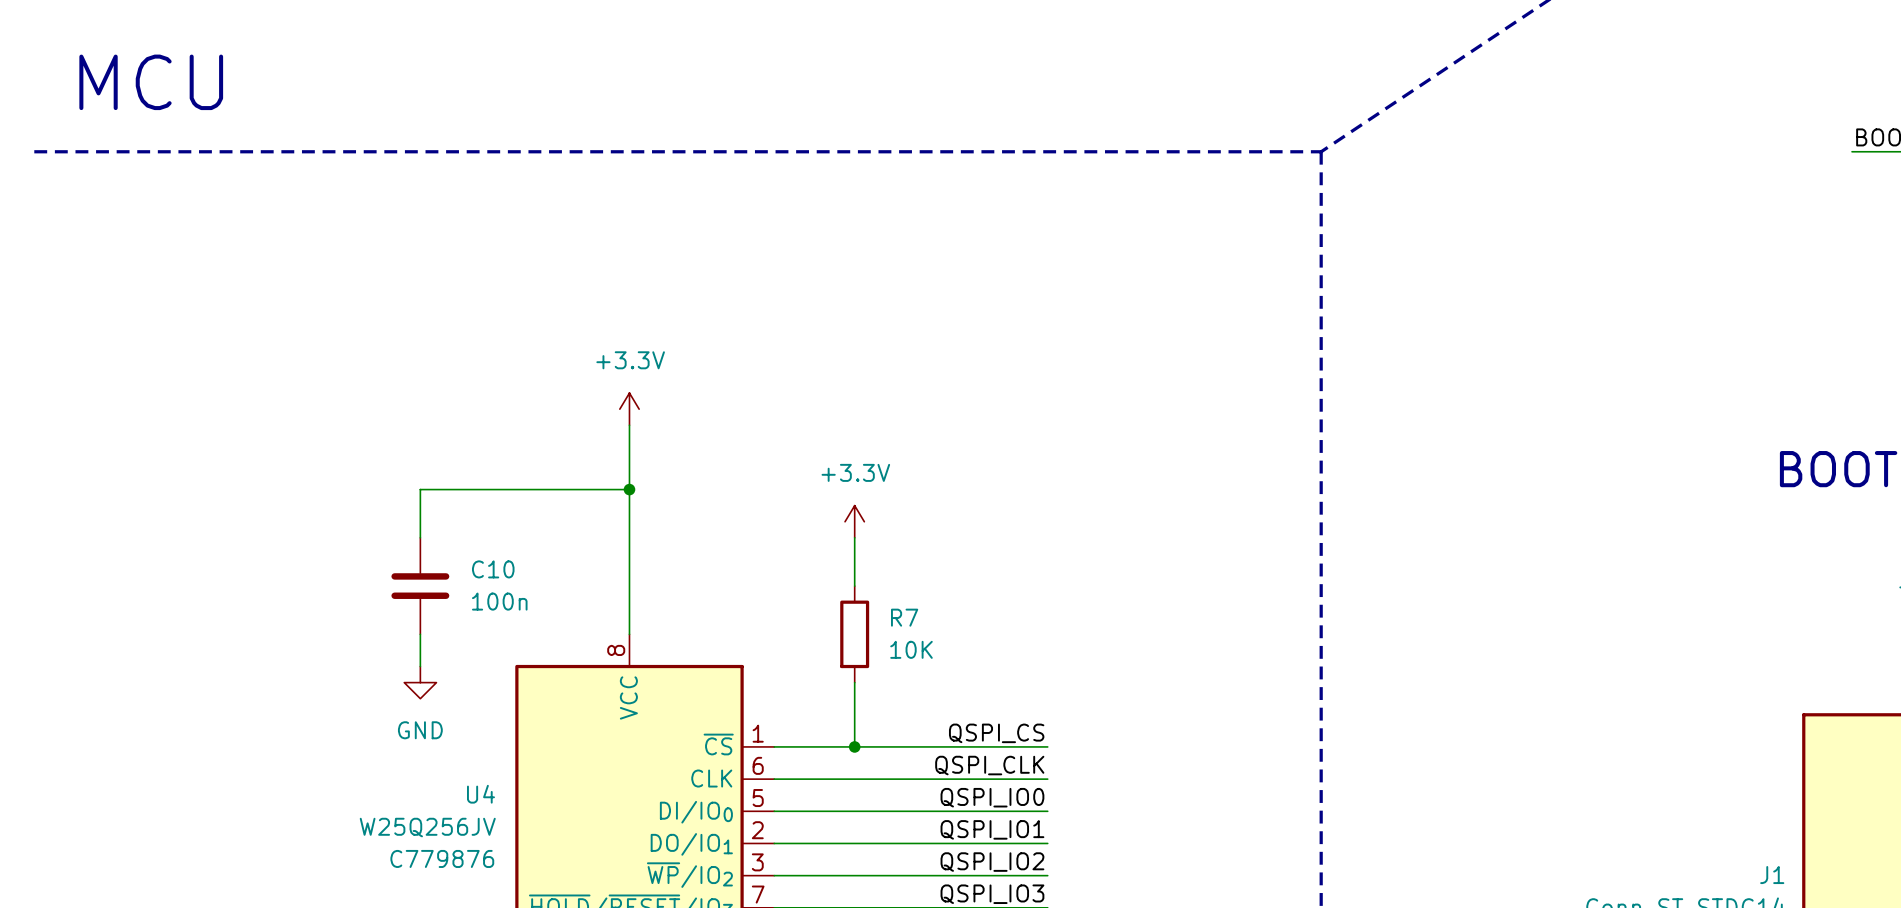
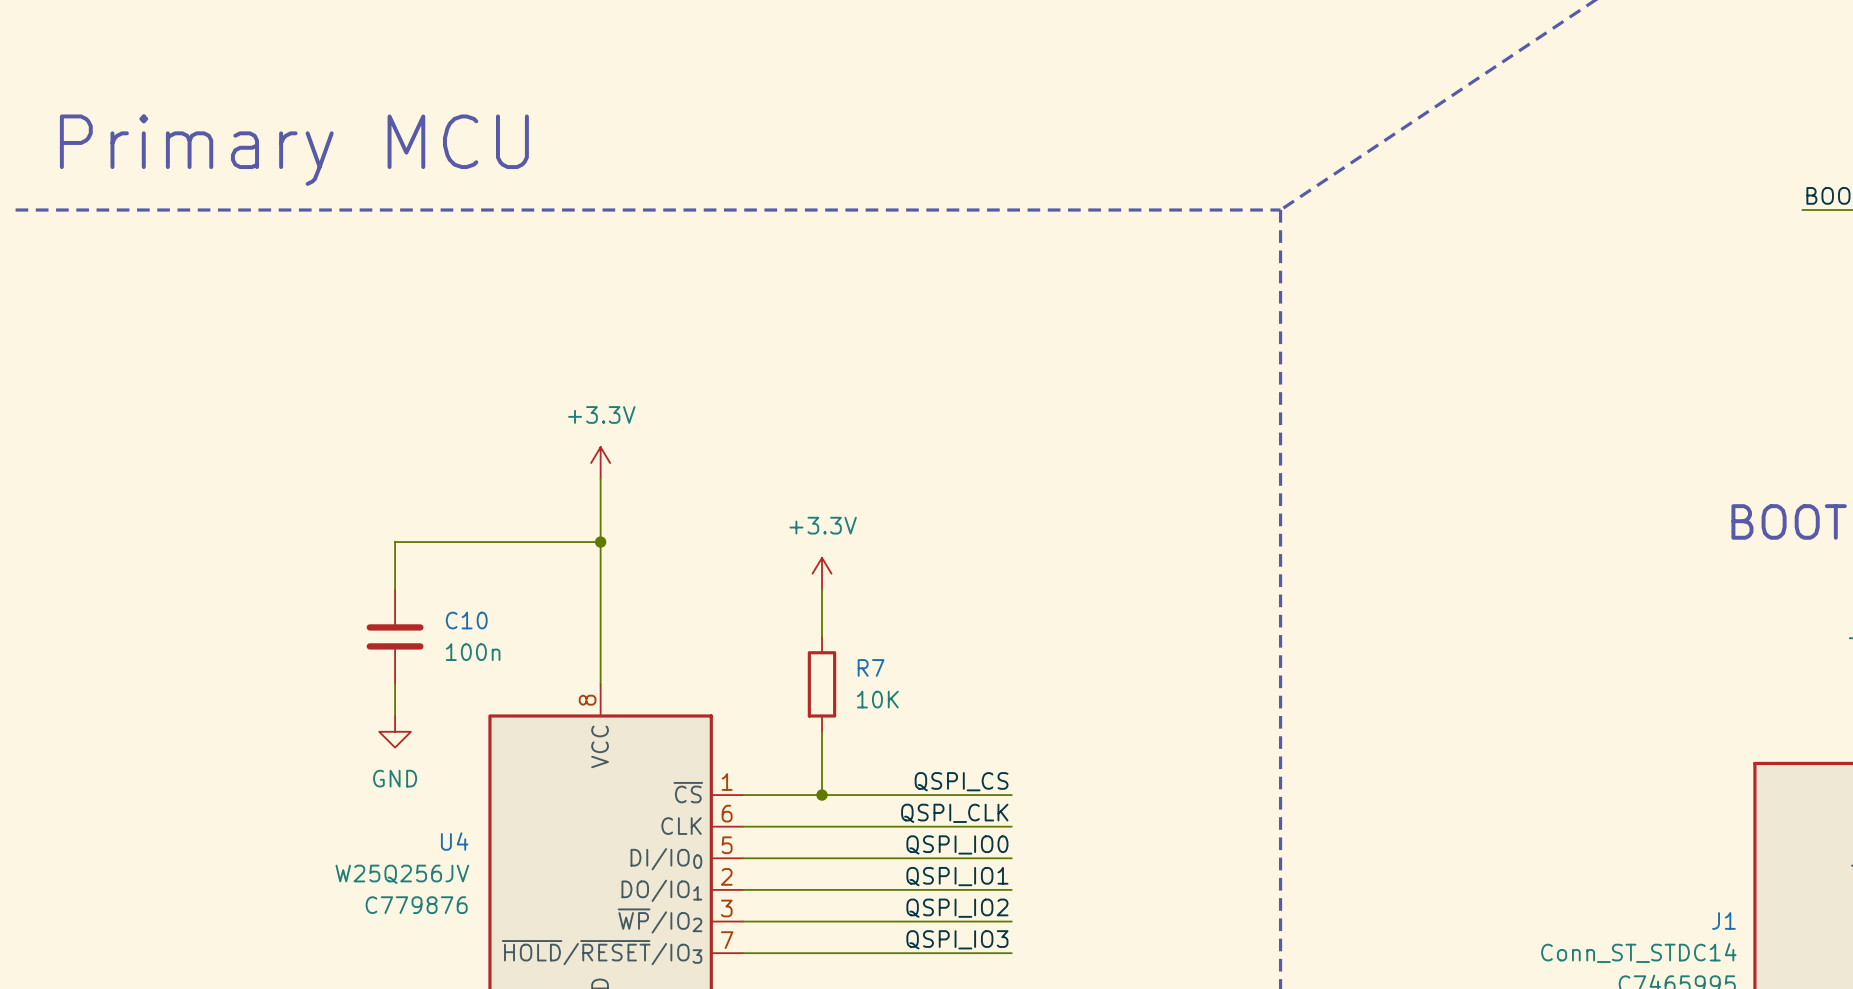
text: MCU (151, 82) -> Primary MCU (294, 150)

